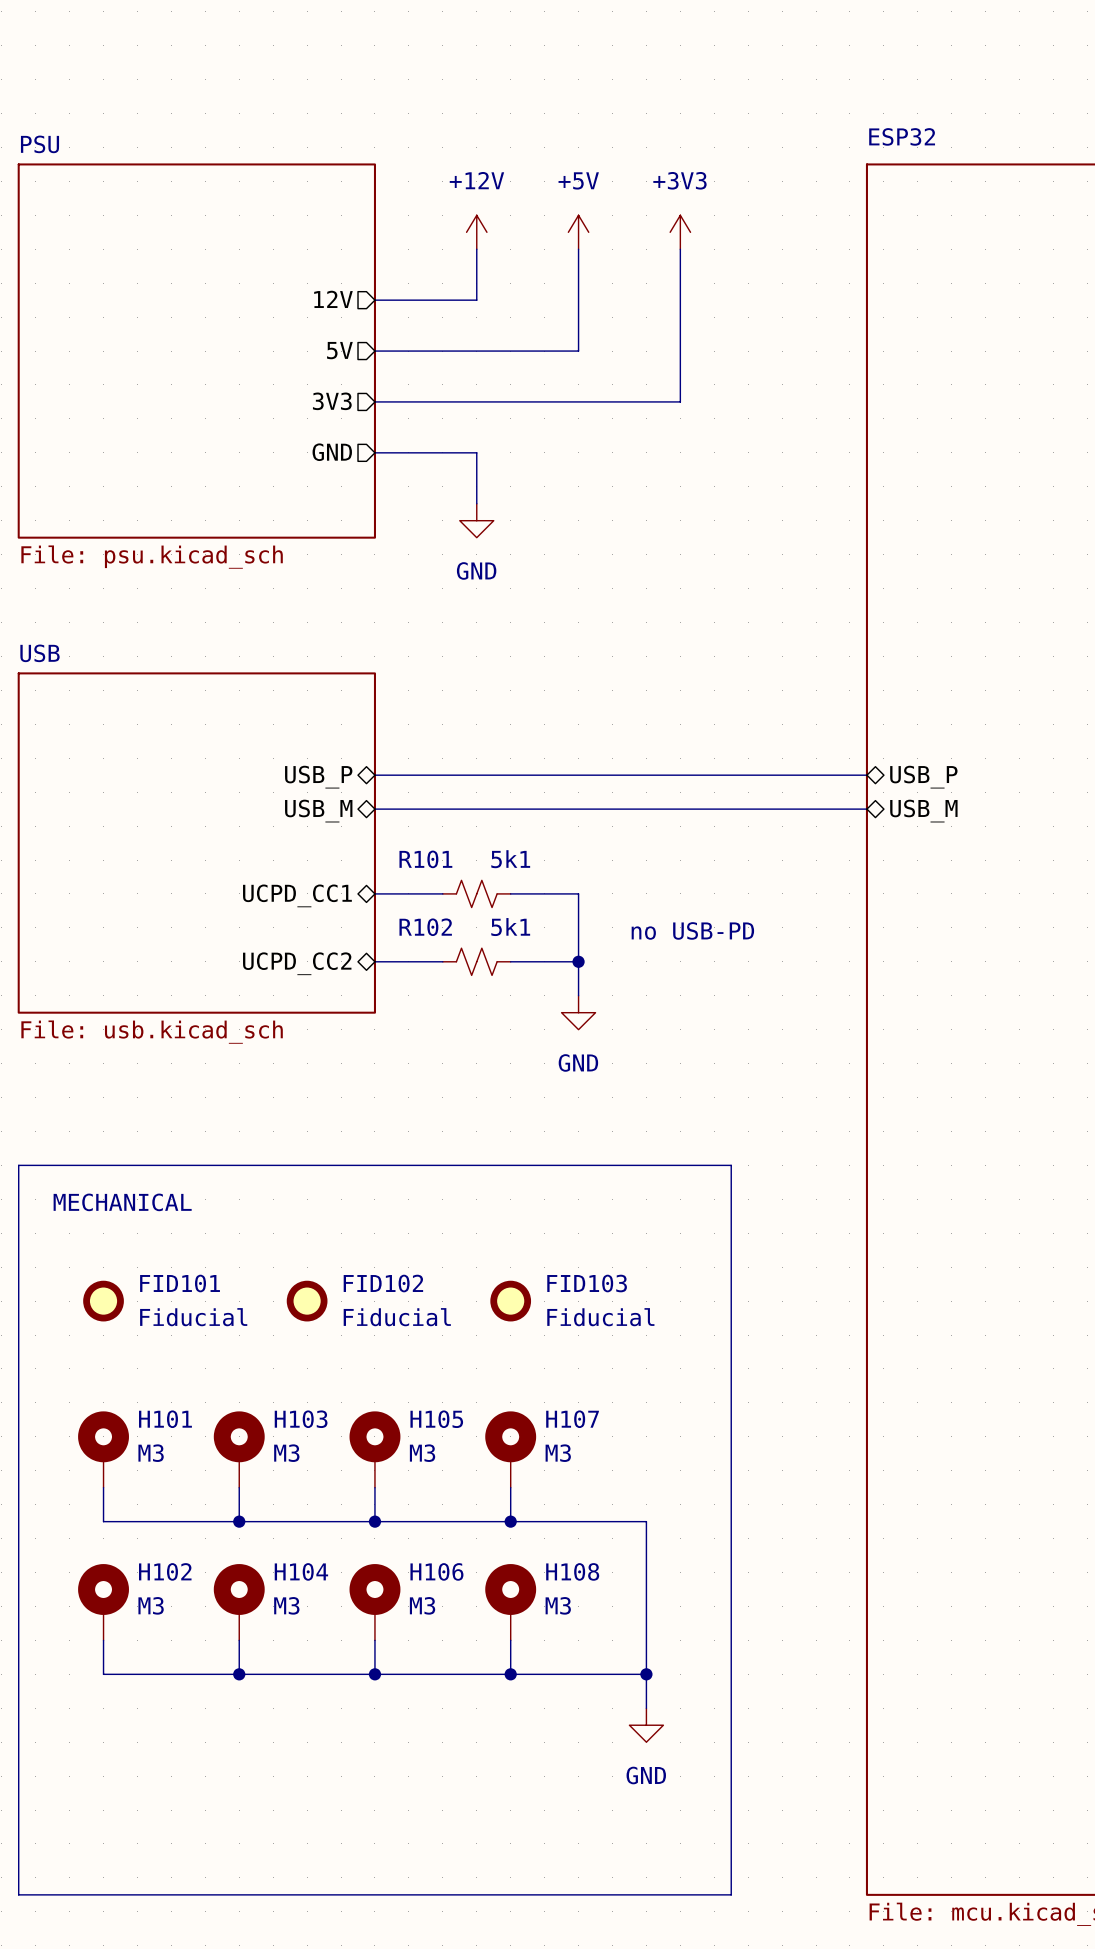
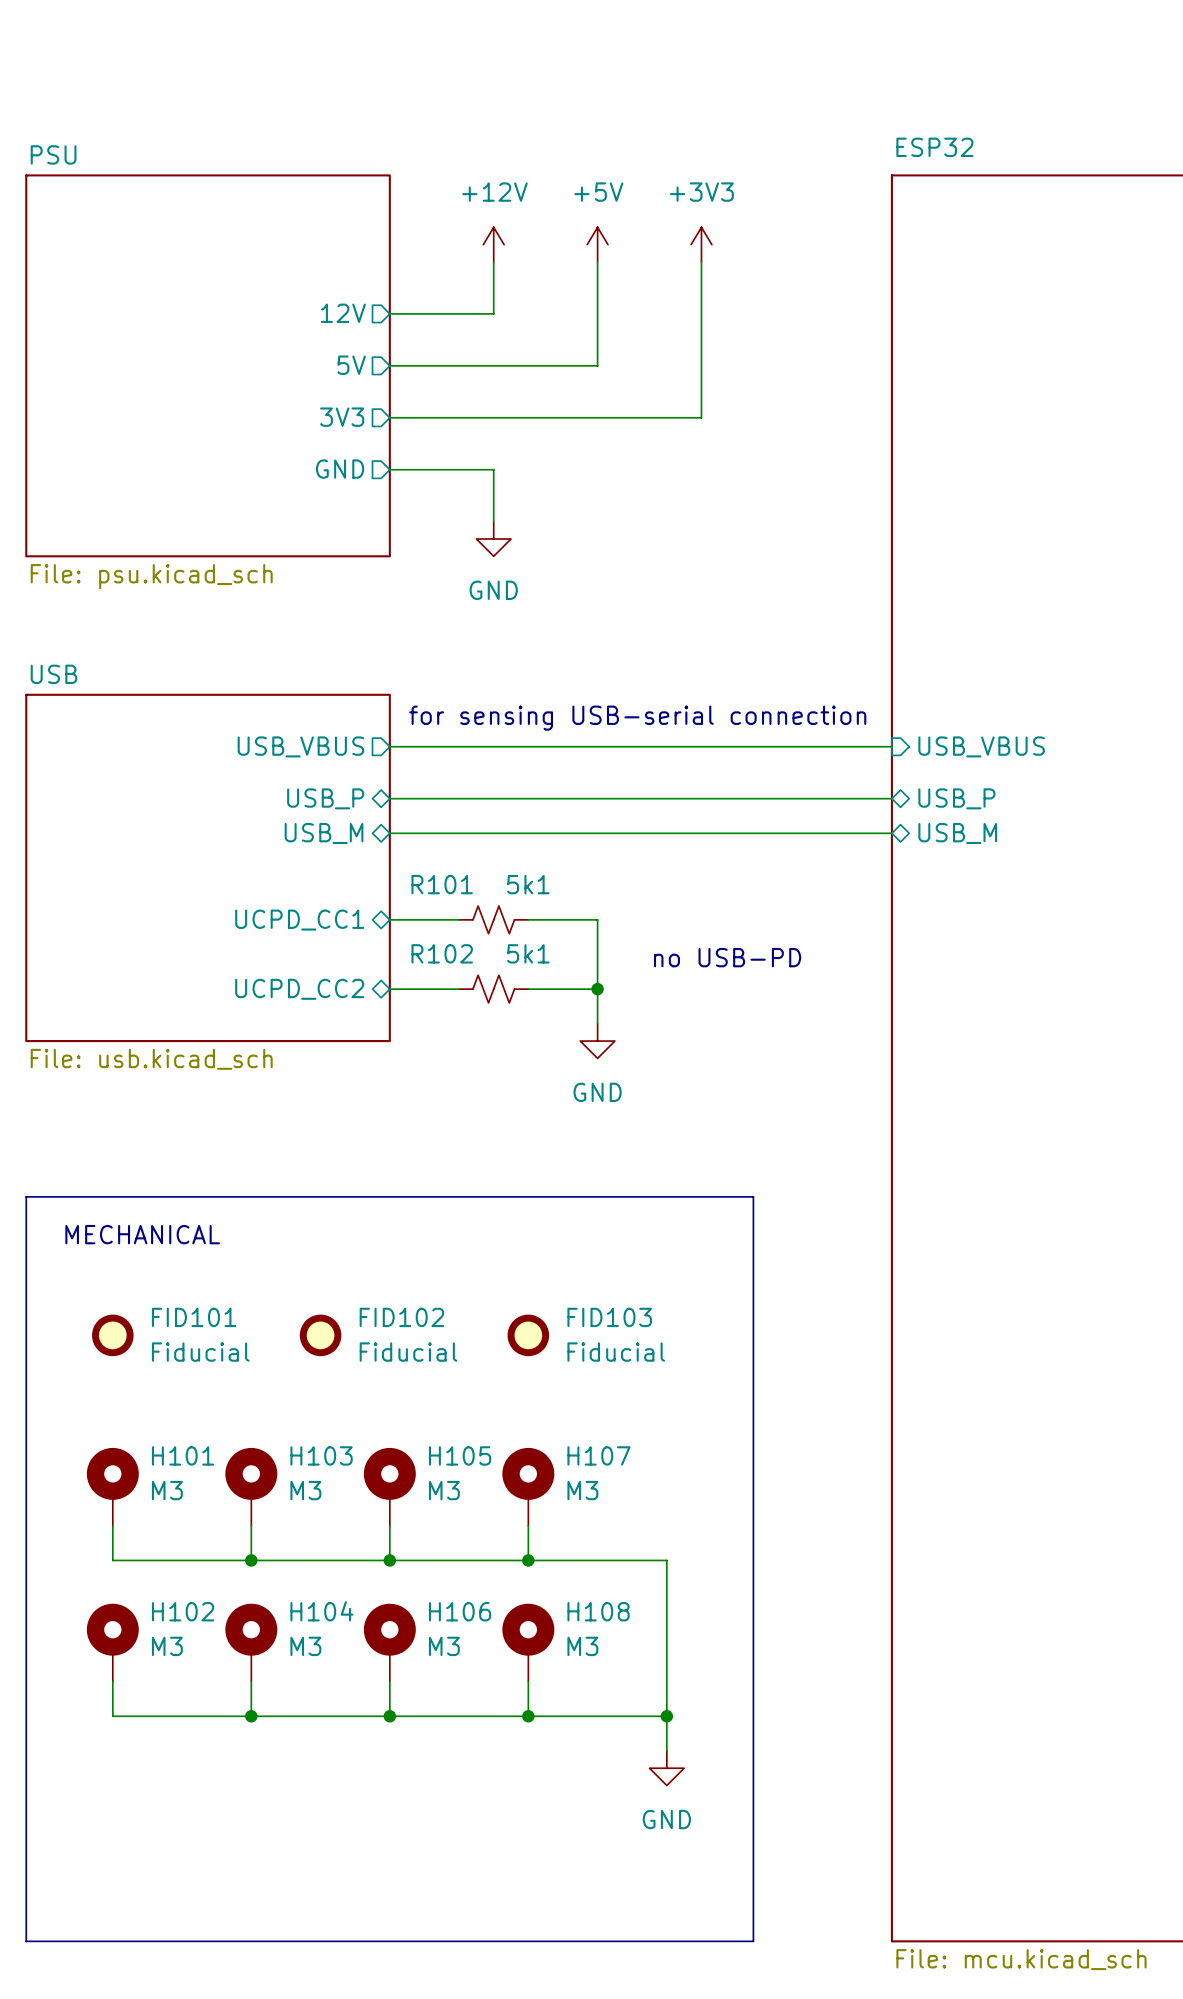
text: none -> for sensing USB-serial connection (637, 718)
wire: none -> (389, 746) (891, 746)
sheet pin: none -> USB_VBUS (300, 746)
sheet pin: none -> USB_VBUS (981, 746)

